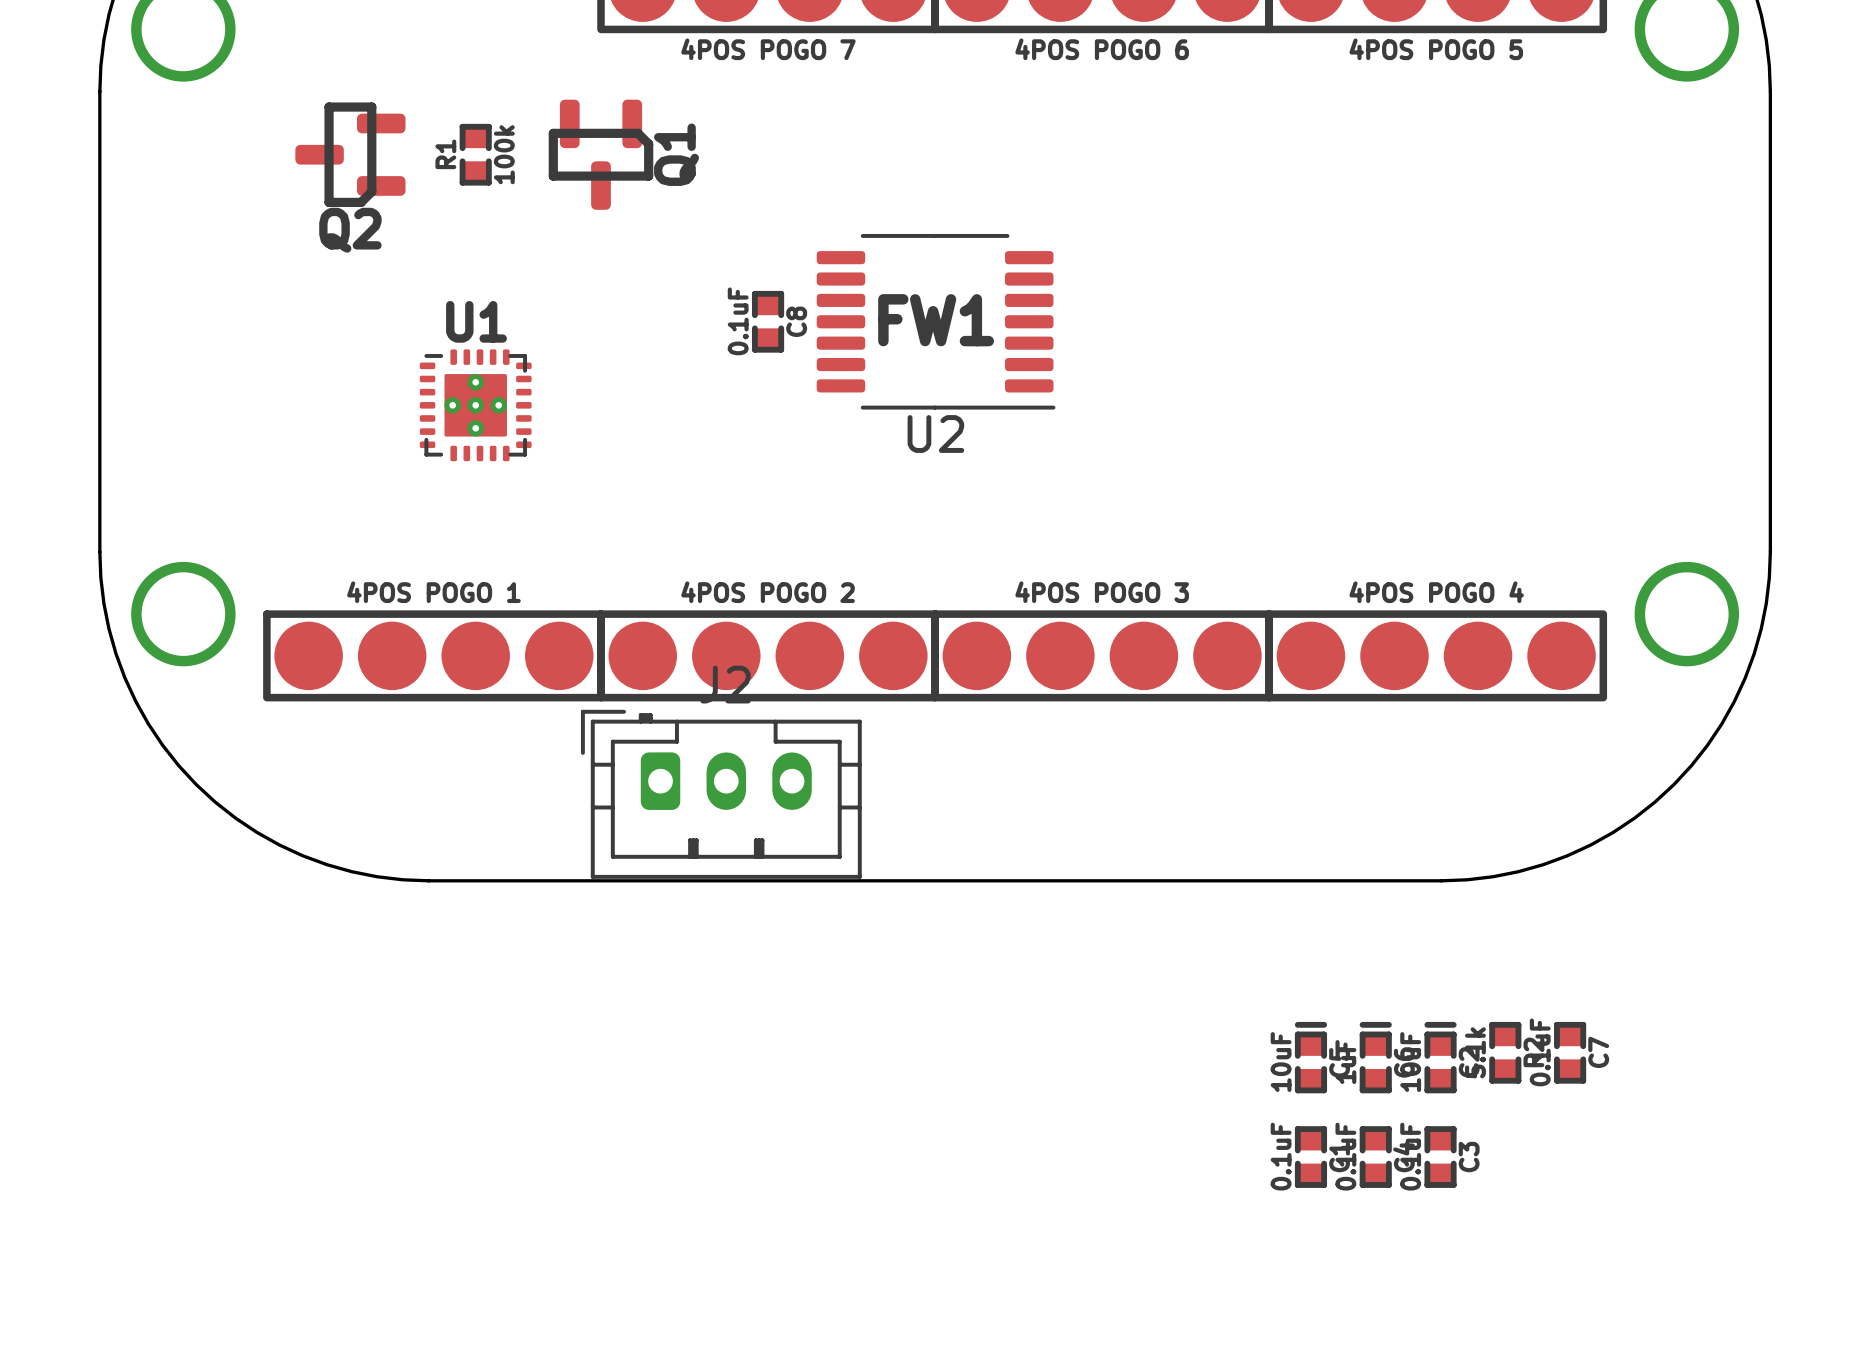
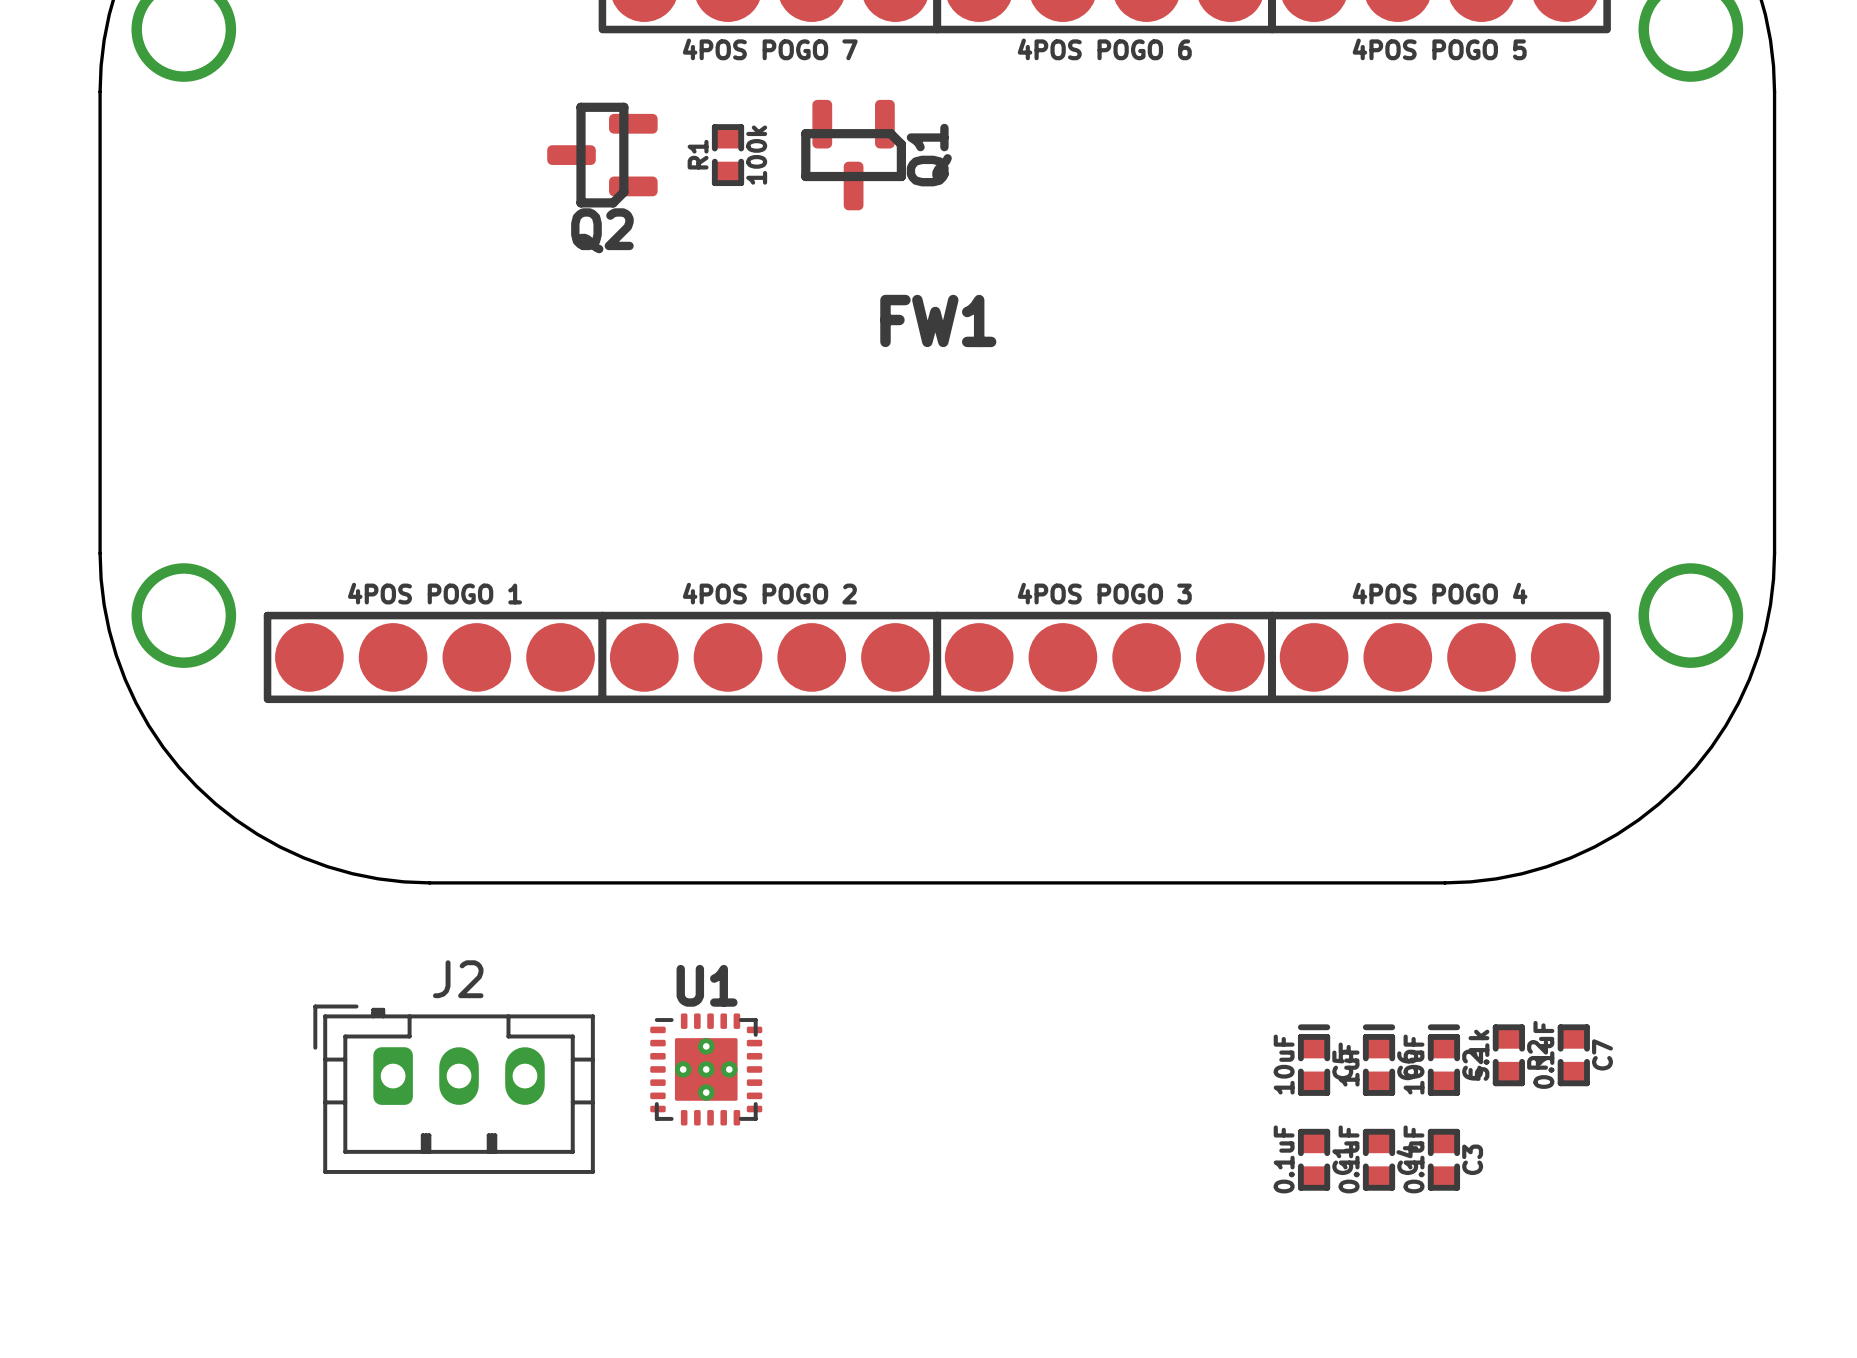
Q2 position: (350, 154) -> (602, 155)
R1 position: (475, 154) -> (728, 155)
Q1 position: (600, 154) -> (853, 155)
C8: 0.1uF (768, 321) -> none
U2: (936, 321) -> none
U1 position: (475, 405) -> (706, 1069)
J2 position: (721, 794) -> (454, 1089)

